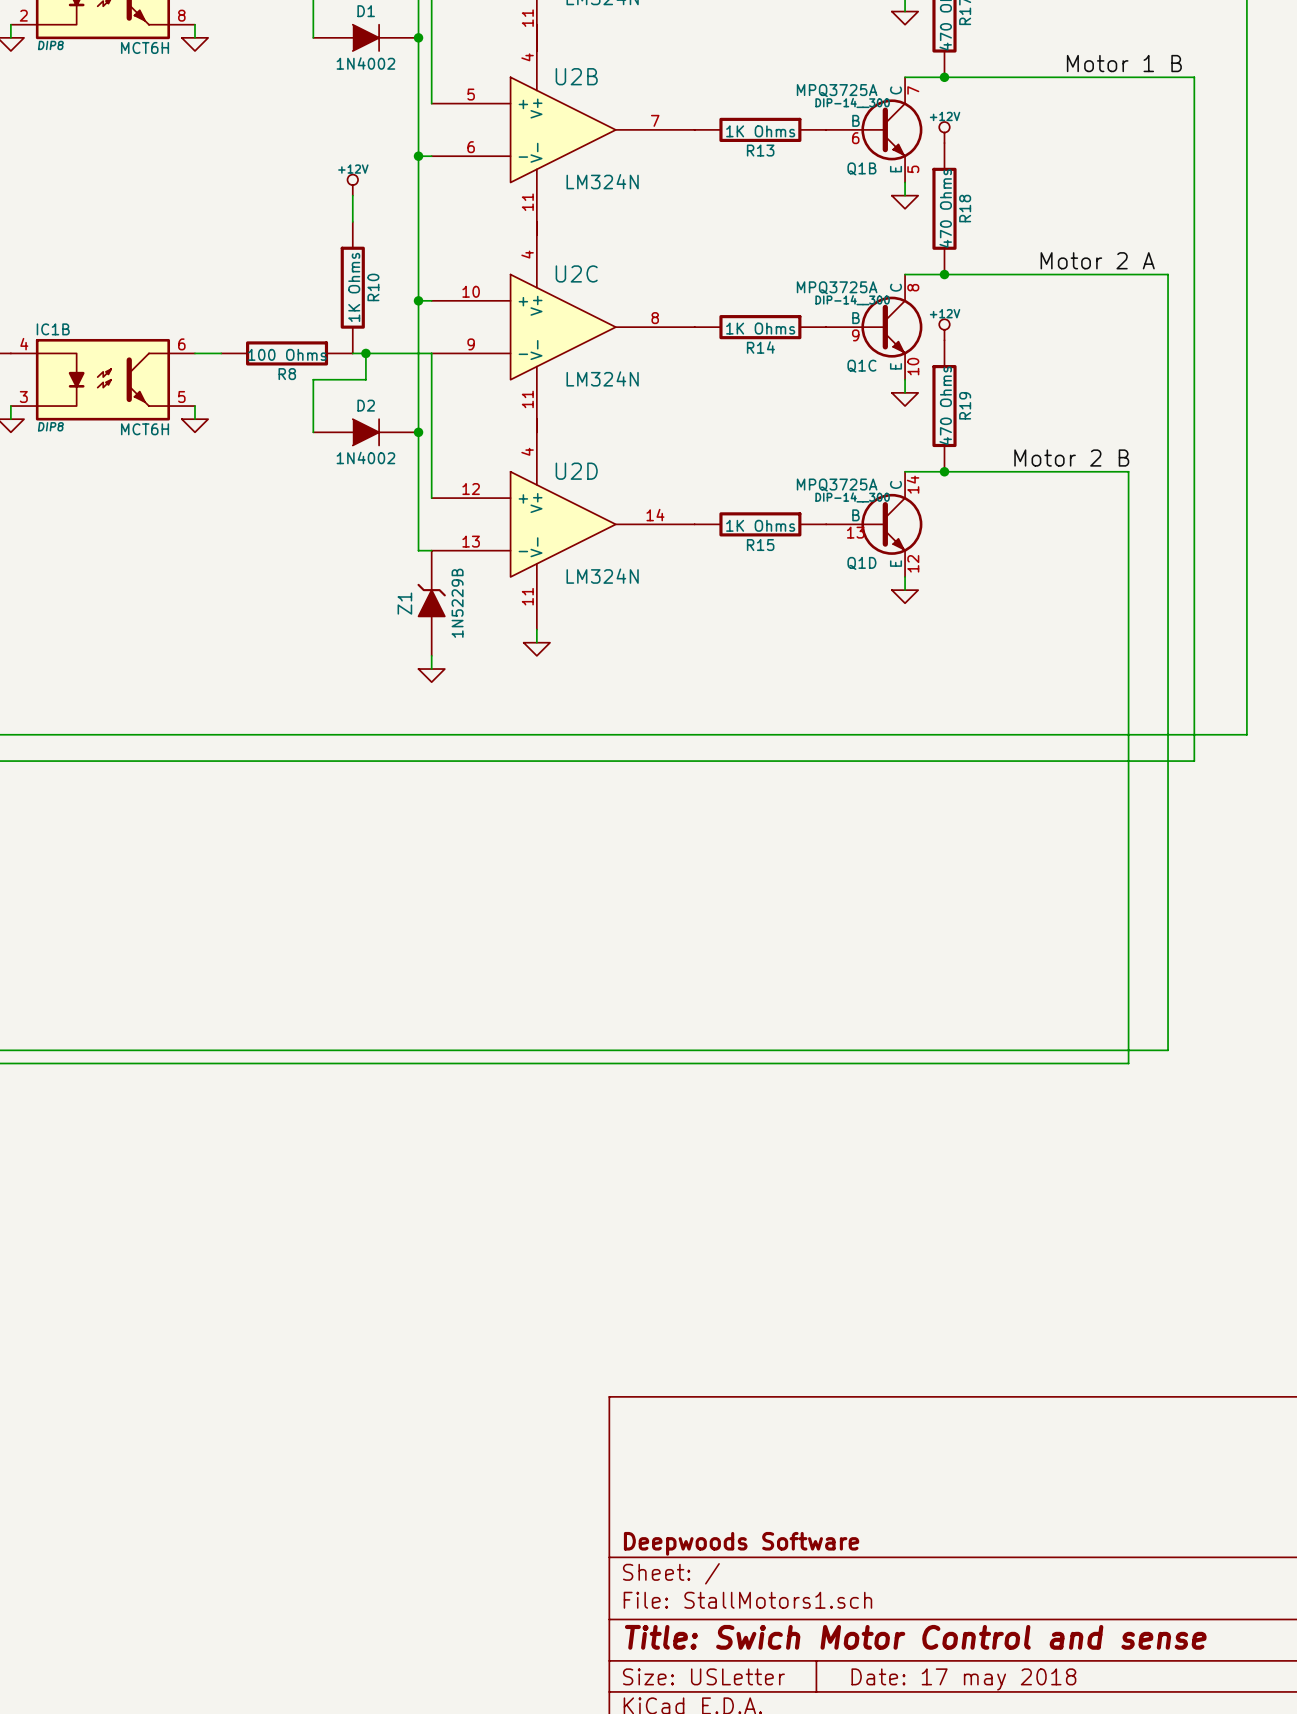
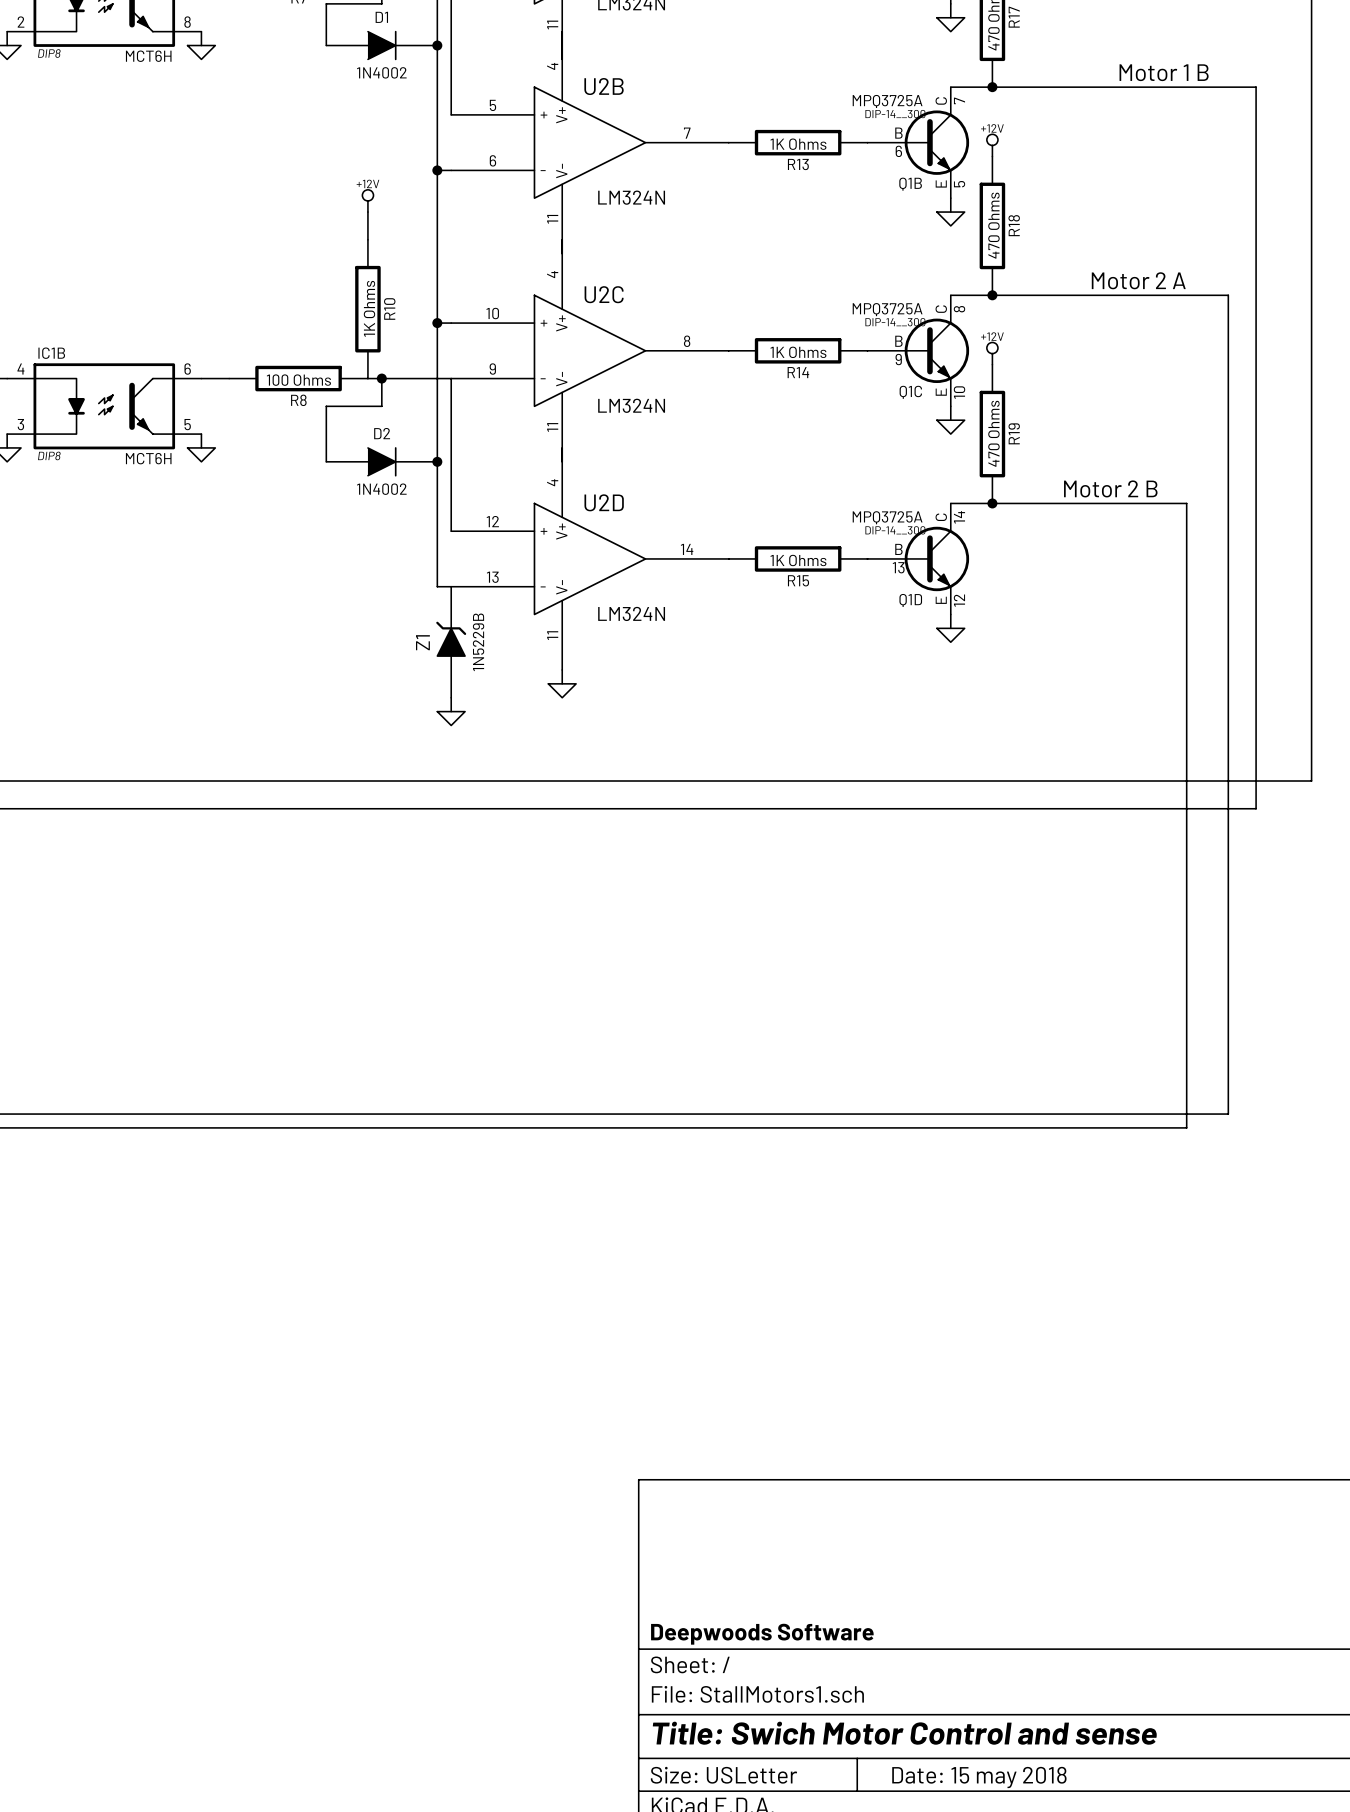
title block: Date: 17 may 2018 (963, 1679) -> Date: 15 may 2018 (979, 1777)

